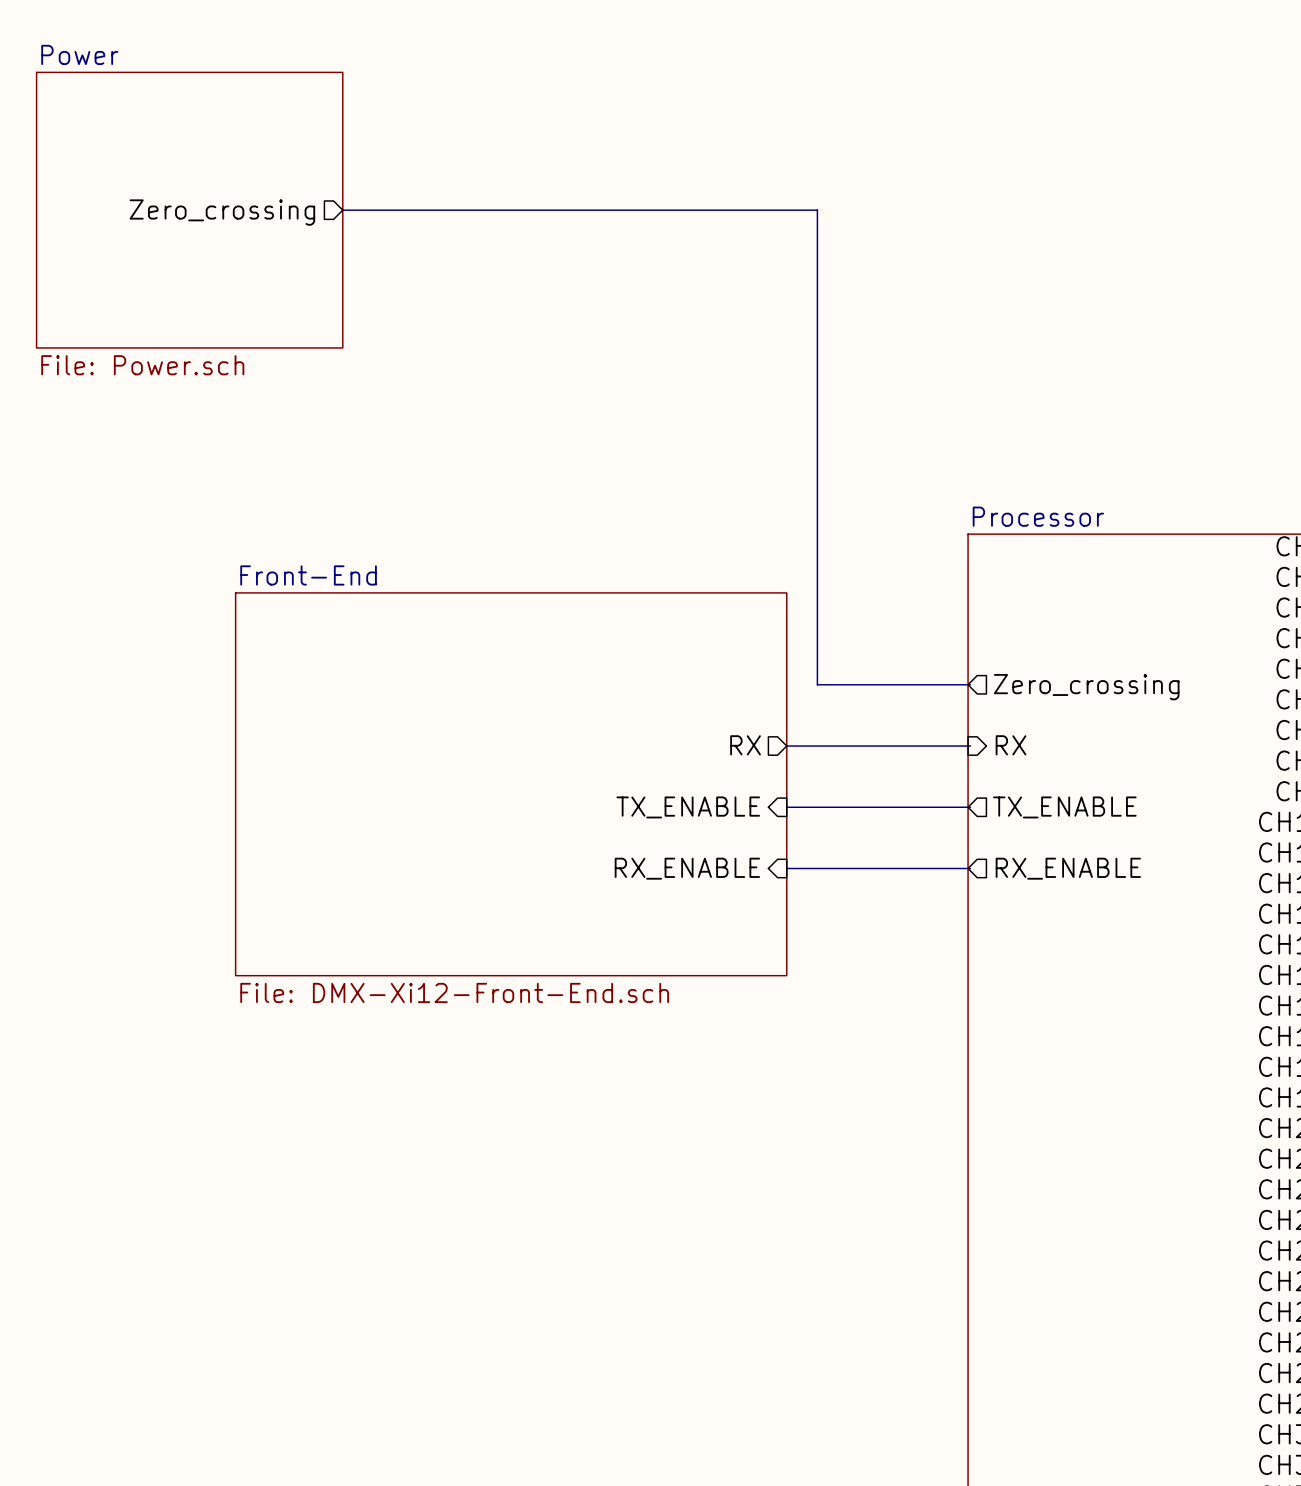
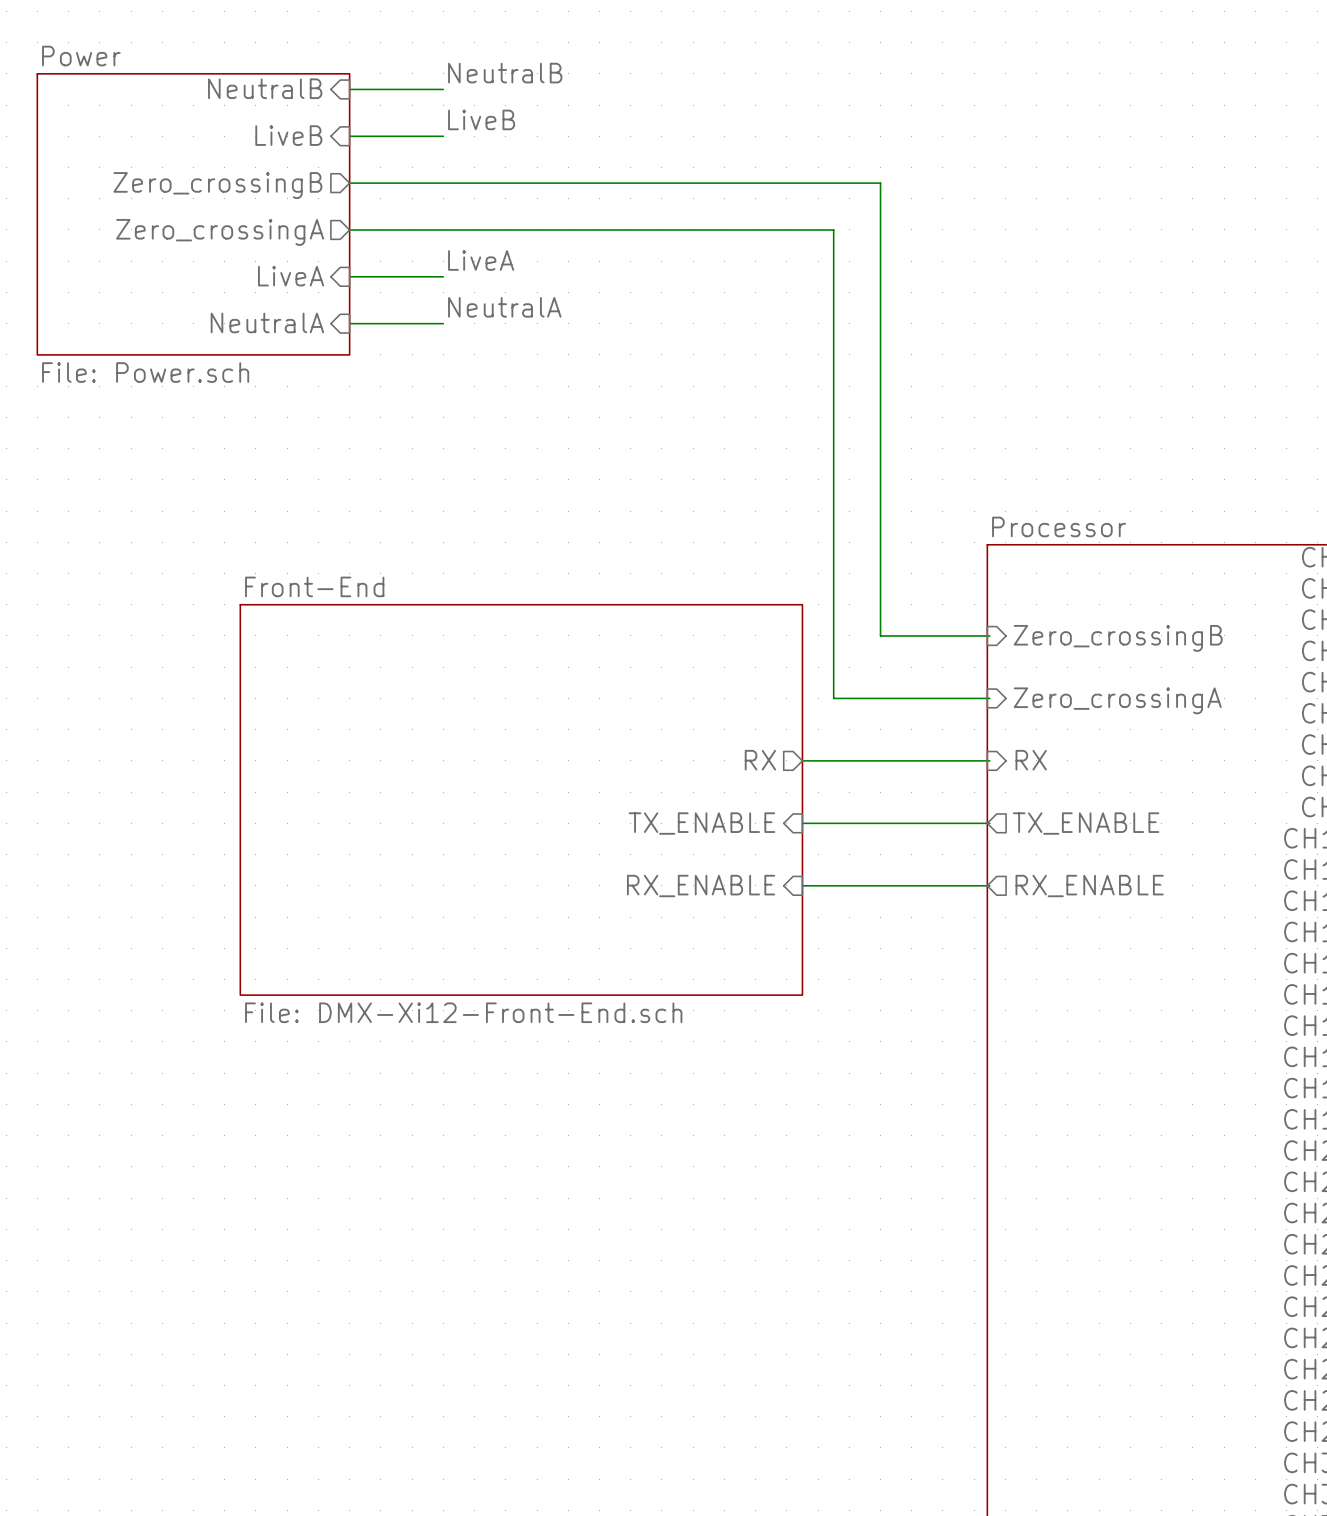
label: none -> NeutralB (505, 73)
sheet pin: none -> NeutralB (265, 88)
wire: none -> (349, 89) (443, 89)
label: none -> LiveB (481, 119)
sheet pin: none -> LiveB (288, 135)
wire: none -> (349, 136) (443, 136)
wire: none -> (349, 183) (880, 183) (880, 635) (989, 635)
sheet pin: none -> Zero_crossingB (217, 185)
wire: (342, 210) (817, 210) (817, 225) -> (349, 229) (833, 229)
sheet pin: Zero_crossing (222, 212) -> none
sheet pin: none -> Zero_crossingA (220, 232)
label: none -> LiveA (481, 260)
sheet pin: none -> LiveA (291, 276)
wire: none -> (349, 276) (443, 276)
label: none -> NeutralA (504, 307)
sheet pin: none -> NeutralA (267, 322)
wire: none -> (349, 323) (443, 323)
sheet pin: none -> Zero_crossingB (1118, 638)
sheet pin shape: output (1086, 687) -> input (1117, 700)
sheet pin: Zero_crossing (1086, 687) -> Zero_crossingA (1117, 700)

